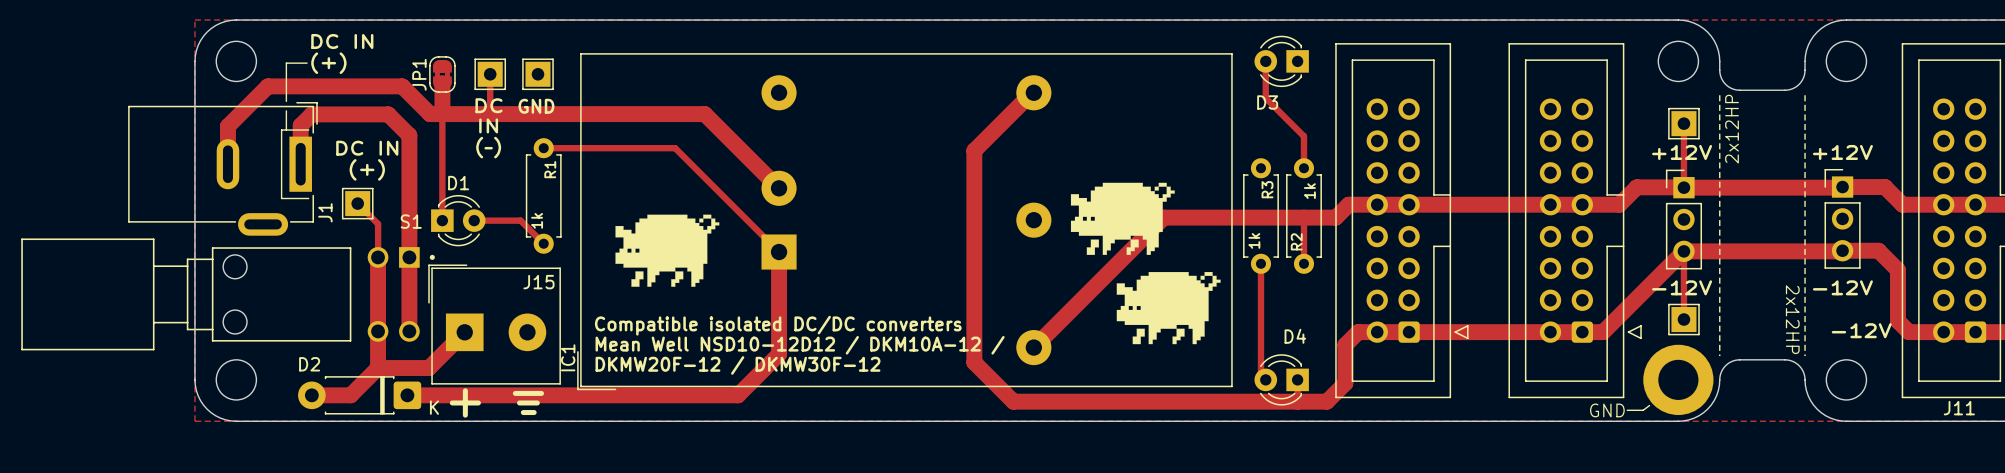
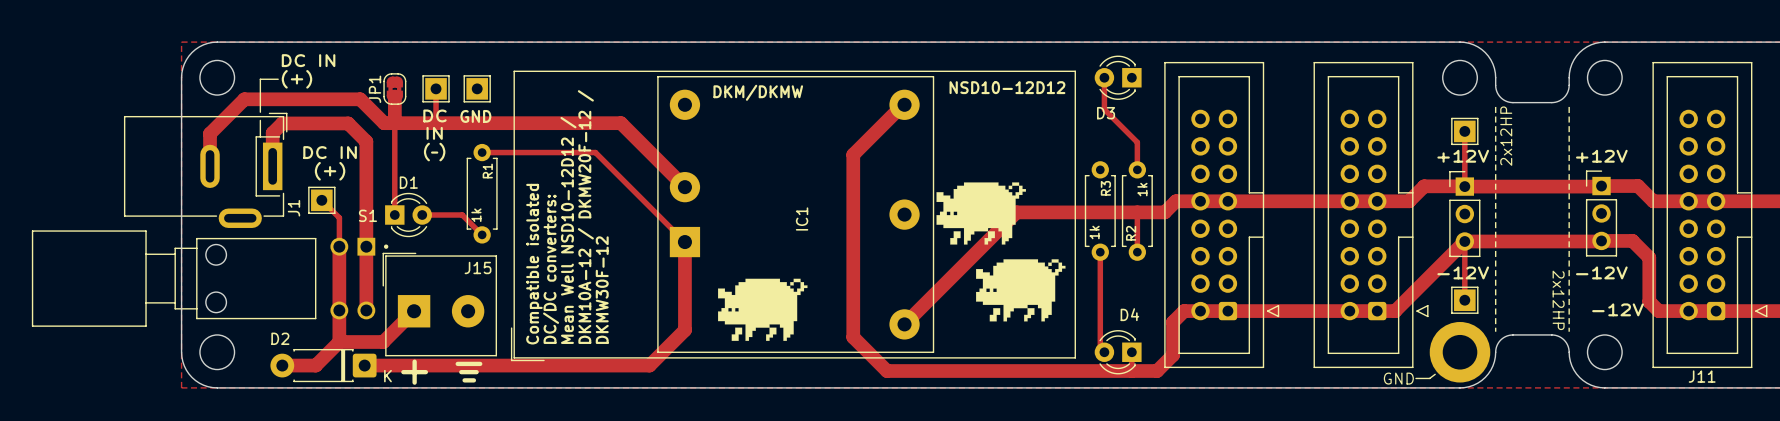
IC1 footprint: [577, 53, 1233, 391] -> [510, 70, 1076, 362]
text: none -> DKM10A-12 / DKMW20F-12 / (585, 217)
drawing position: (667, 250) -> (762, 309)
text: none -> Compatible isolated (534, 264)
text: none -> DC/DC converters: (551, 269)
text: Compatible isolated DC/DC converters (778, 325) -> none
text: Mean Well NSD10-12D12 / DKM10A-12 / (800, 345) -> Mean Well NSD10-12D12 / (568, 230)
IC1 name position: IC1 (568, 357) -> IC1 (802, 218)
text: DKMW20F-12 / DKMW30F-12 (737, 365) -> DKMW30F-12 (602, 290)

